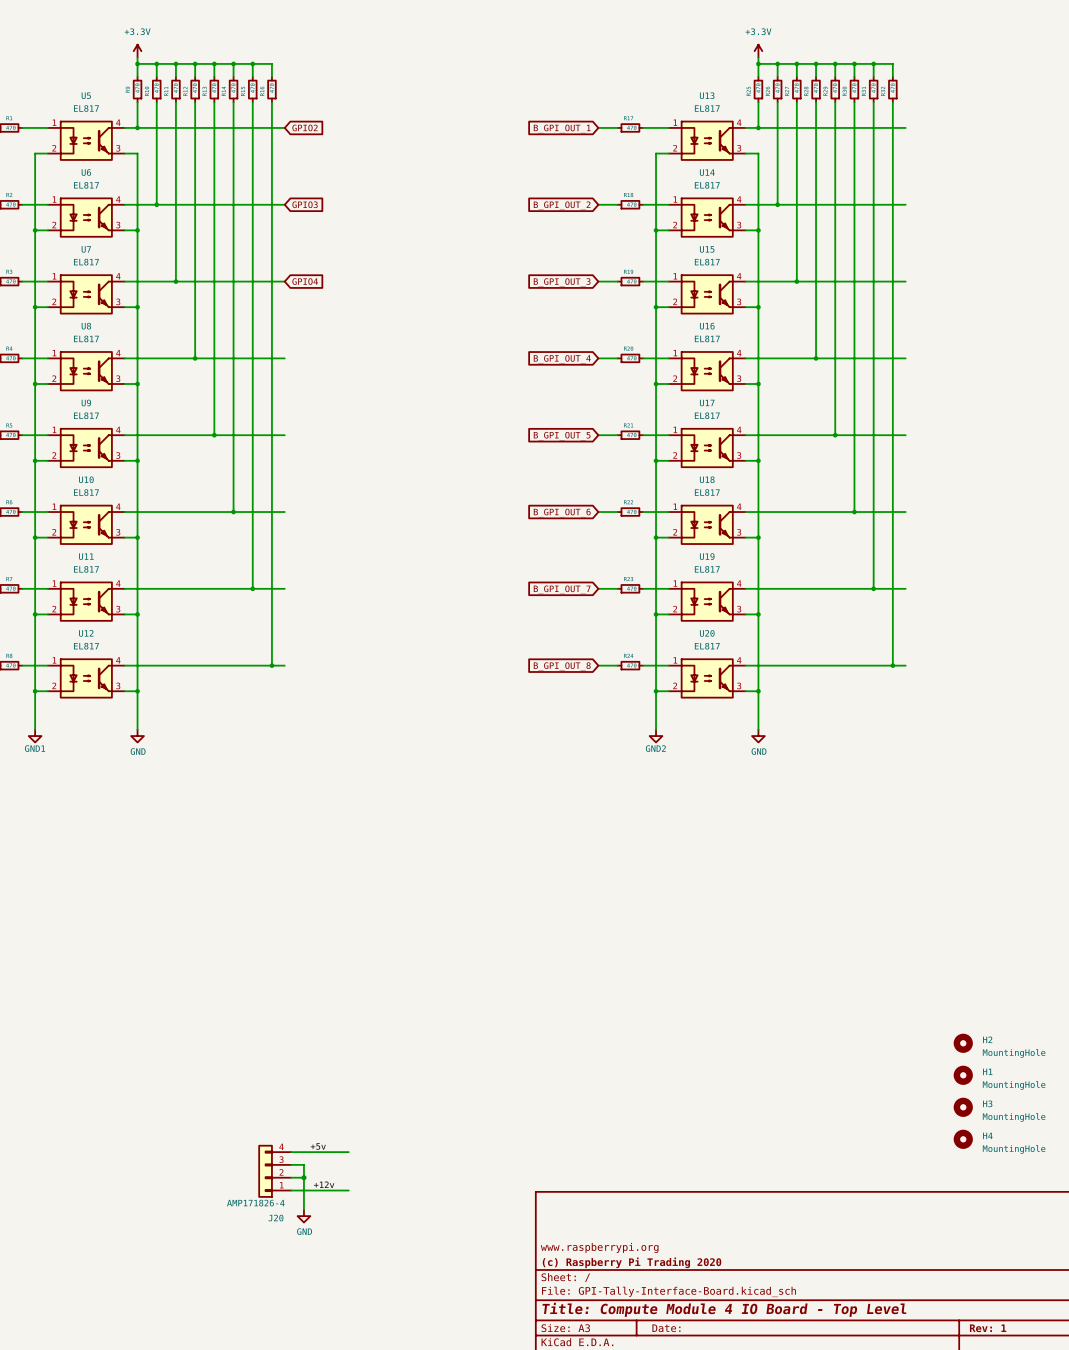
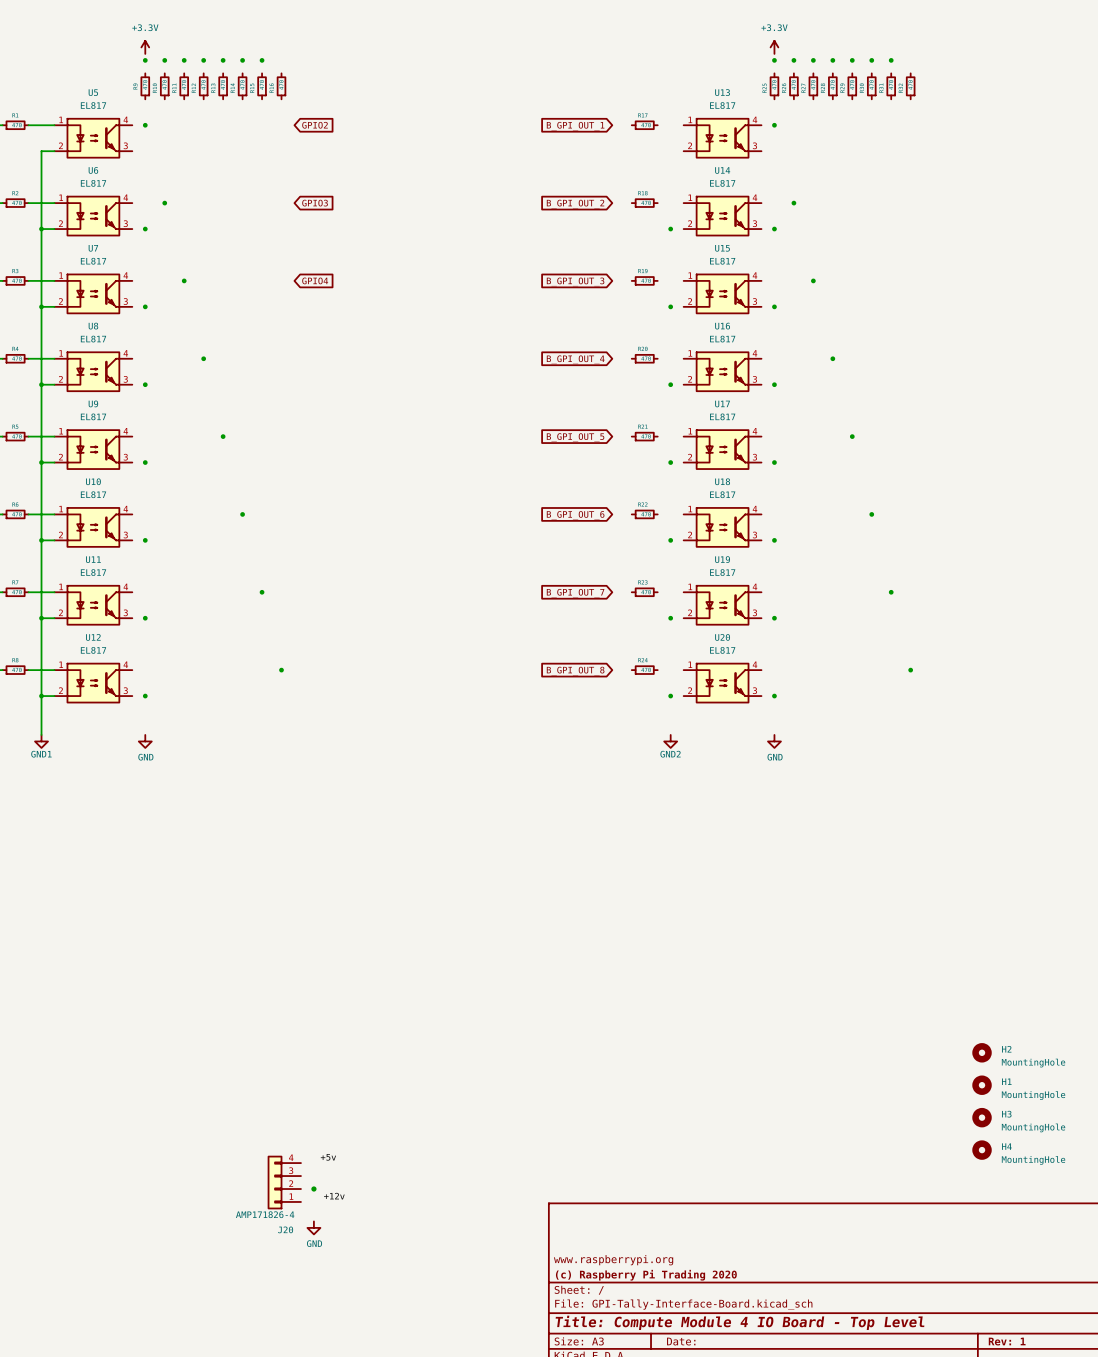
wire: (137, 57) (137, 76) -> none
wire: (758, 57) (758, 76) -> none
wire: (137, 63) (271, 63) (271, 76) -> none
wire: (156, 63) (156, 76) -> none
wire: (175, 63) (175, 76) -> none
wire: (195, 63) (195, 76) -> none
wire: (214, 63) (214, 76) -> none
wire: (233, 63) (233, 76) -> none
wire: (252, 63) (252, 76) -> none
wire: (758, 63) (892, 63) (892, 76) -> none
wire: (777, 63) (777, 76) -> none
wire: (796, 63) (796, 76) -> none
wire: (816, 63) (816, 76) -> none
wire: (835, 63) (835, 76) -> none
wire: (854, 63) (854, 76) -> none
wire: (873, 63) (873, 76) -> none
wire: (137, 102) (137, 127) -> none
wire: (156, 102) (156, 204) -> none
wire: (175, 102) (175, 281) -> none
wire: (195, 102) (195, 358) -> none
wire: (214, 102) (214, 435) -> none
wire: (233, 102) (233, 512) -> none
wire: (252, 102) (252, 588) -> none
wire: (271, 102) (271, 665) -> none
wire: (758, 102) (758, 127) -> none
wire: (777, 102) (777, 204) -> none
wire: (796, 102) (796, 281) -> none
wire: (816, 102) (816, 358) -> none
wire: (835, 102) (835, 435) -> none
wire: (854, 102) (854, 512) -> none
wire: (873, 102) (873, 588) -> none
wire: (892, 102) (892, 665) -> none
wire: (124, 127) (284, 127) -> none
wire: (598, 127) (617, 127) -> none
wire: (643, 127) (668, 127) -> none
wire: (745, 127) (905, 127) -> none
wire: (124, 153) (137, 153) (137, 729) -> none
wire: (668, 153) (656, 153) (656, 729) -> none
wire: (745, 153) (758, 153) (758, 729) -> none
wire: (124, 204) (284, 204) -> none
wire: (598, 204) (617, 204) -> none
wire: (643, 204) (668, 204) -> none
wire: (745, 204) (905, 204) -> none
wire: (124, 230) (137, 230) -> none
wire: (656, 230) (668, 230) -> none
wire: (745, 230) (758, 230) -> none
wire: (124, 281) (284, 281) -> none
wire: (598, 281) (617, 281) -> none
wire: (643, 281) (668, 281) -> none
wire: (745, 281) (905, 281) -> none
wire: (124, 307) (137, 307) -> none
wire: (656, 307) (668, 307) -> none
wire: (745, 307) (758, 307) -> none
wire: (124, 358) (284, 358) -> none
wire: (598, 358) (617, 358) -> none
wire: (643, 358) (668, 358) -> none
wire: (745, 358) (905, 358) -> none
wire: (124, 383) (137, 383) -> none
wire: (656, 383) (668, 383) -> none
wire: (745, 383) (758, 383) -> none
wire: (124, 435) (284, 435) -> none
wire: (598, 435) (617, 435) -> none
wire: (643, 435) (668, 435) -> none
wire: (745, 435) (905, 435) -> none
wire: (124, 460) (137, 460) -> none
wire: (656, 460) (668, 460) -> none
wire: (745, 460) (758, 460) -> none
wire: (124, 512) (284, 512) -> none
wire: (598, 512) (617, 512) -> none
wire: (643, 512) (668, 512) -> none
wire: (745, 512) (905, 512) -> none
wire: (124, 537) (137, 537) -> none
wire: (656, 537) (668, 537) -> none
wire: (745, 537) (758, 537) -> none
wire: (124, 588) (284, 588) -> none
wire: (598, 588) (617, 588) -> none
wire: (643, 588) (668, 588) -> none
wire: (745, 588) (905, 588) -> none
wire: (124, 614) (137, 614) -> none
wire: (656, 614) (668, 614) -> none
wire: (745, 614) (758, 614) -> none
wire: (124, 665) (284, 665) -> none
wire: (598, 665) (617, 665) -> none
wire: (643, 665) (668, 665) -> none
wire: (745, 665) (905, 665) -> none
wire: (124, 691) (137, 691) -> none
wire: (656, 691) (668, 691) -> none
wire: (745, 691) (758, 691) -> none
wire: (291, 1152) (348, 1152) -> none
wire: (291, 1164) (303, 1164) (303, 1209) -> none
wire: (291, 1177) (303, 1177) -> none
wire: (291, 1190) (348, 1190) -> none

